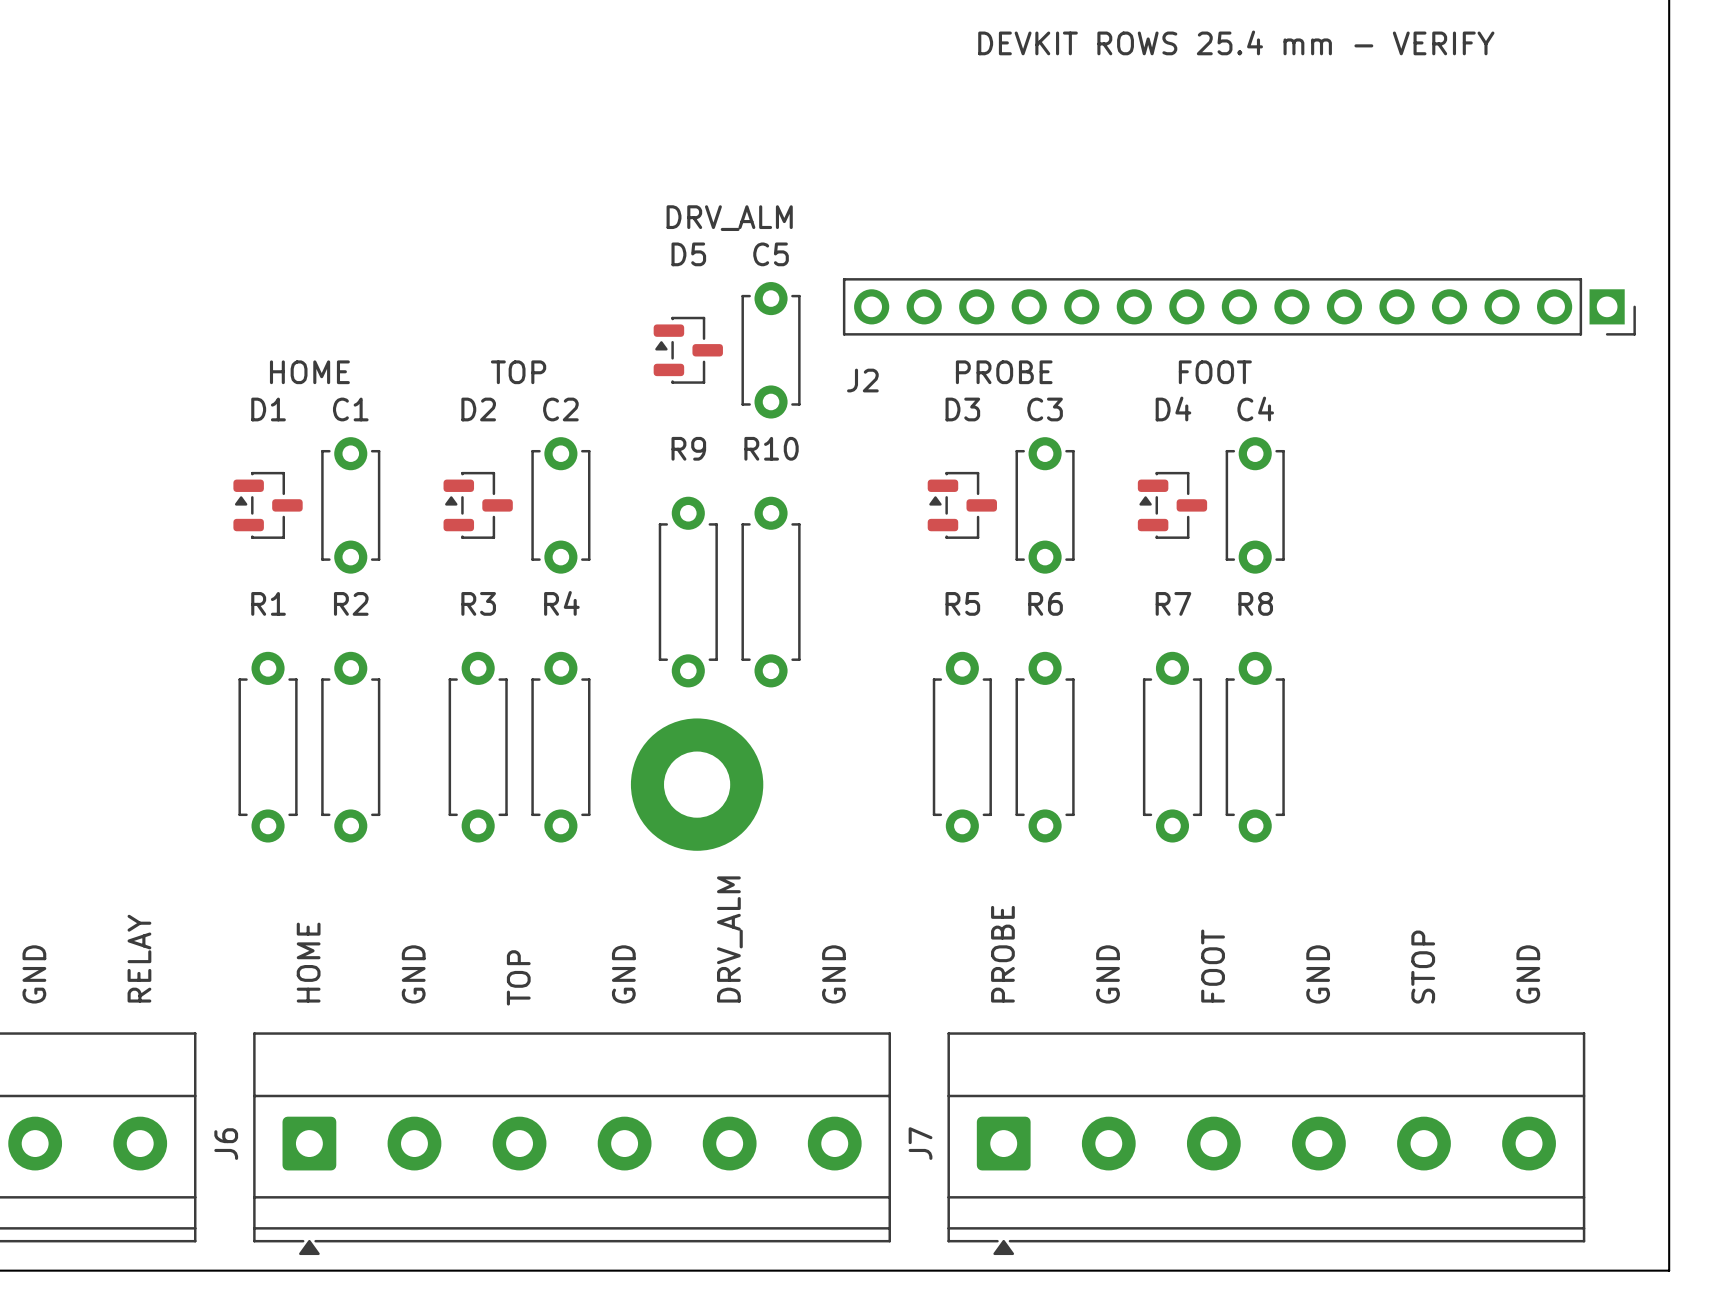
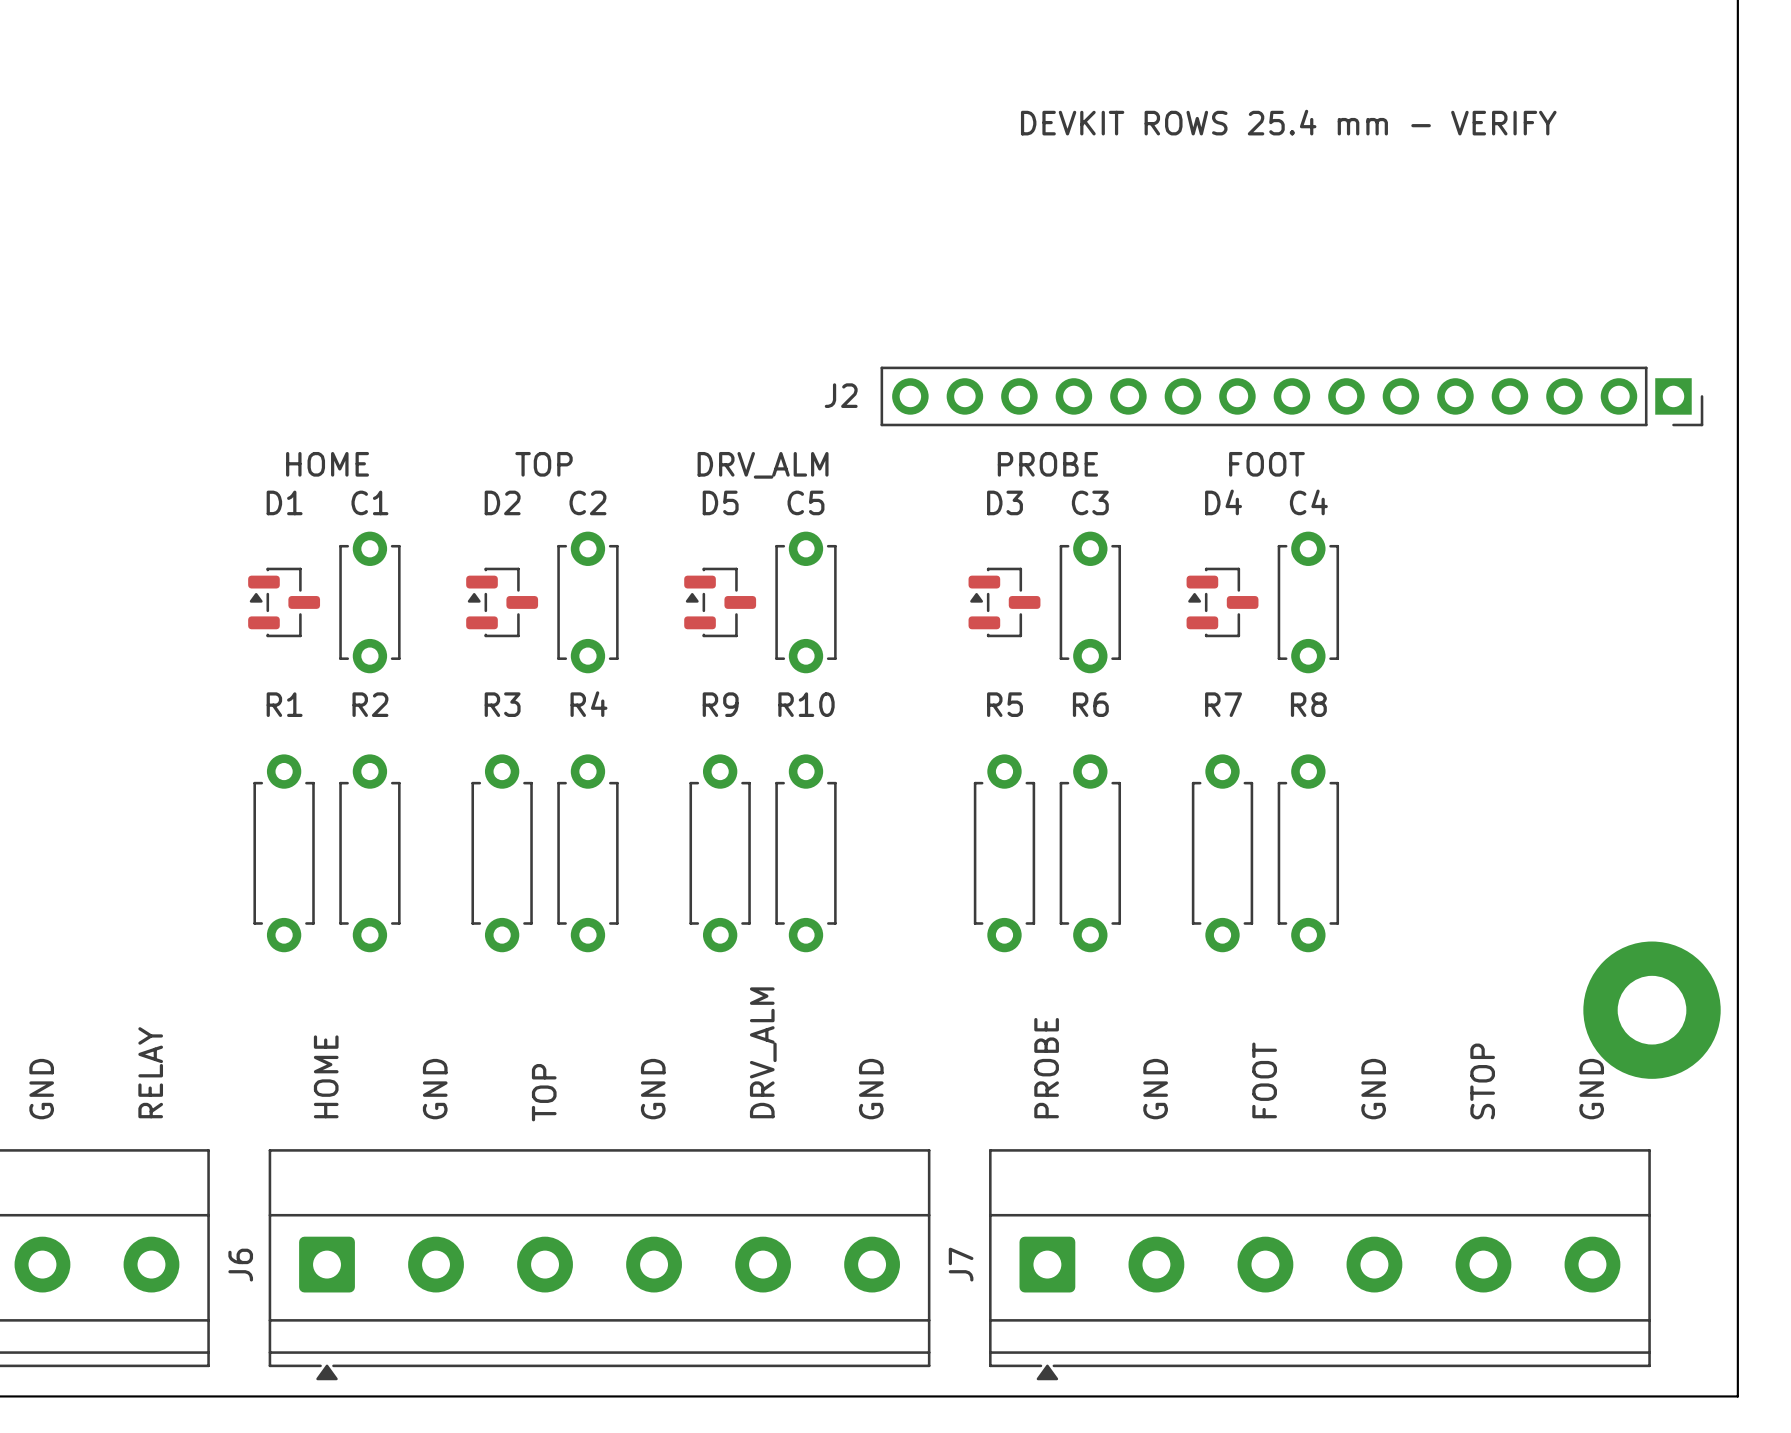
text position: DRV_ALM (729, 218) -> DRV_ALM (763, 465)
D5 position: (688, 350) -> (720, 602)
C5 position: (771, 350) -> (805, 602)
J2 name position: J2 (862, 380) -> J2 (841, 395)
R9 position: (688, 592) -> (720, 853)
R10 position: (771, 592) -> (805, 853)
part: (697, 784) -> none
part: none -> (1652, 1010)

